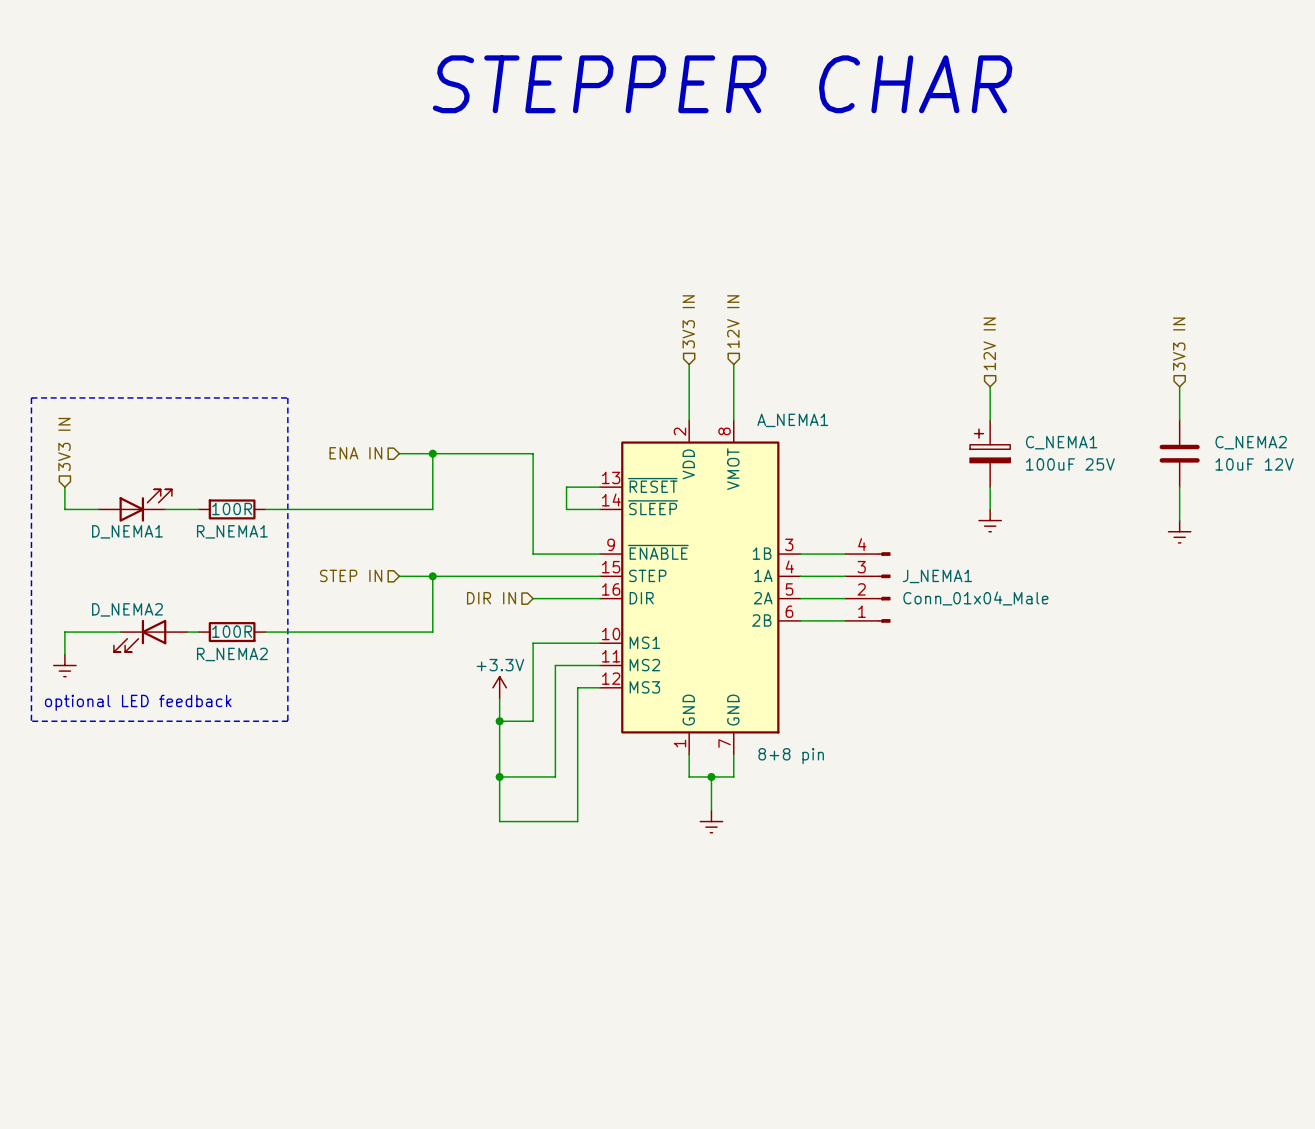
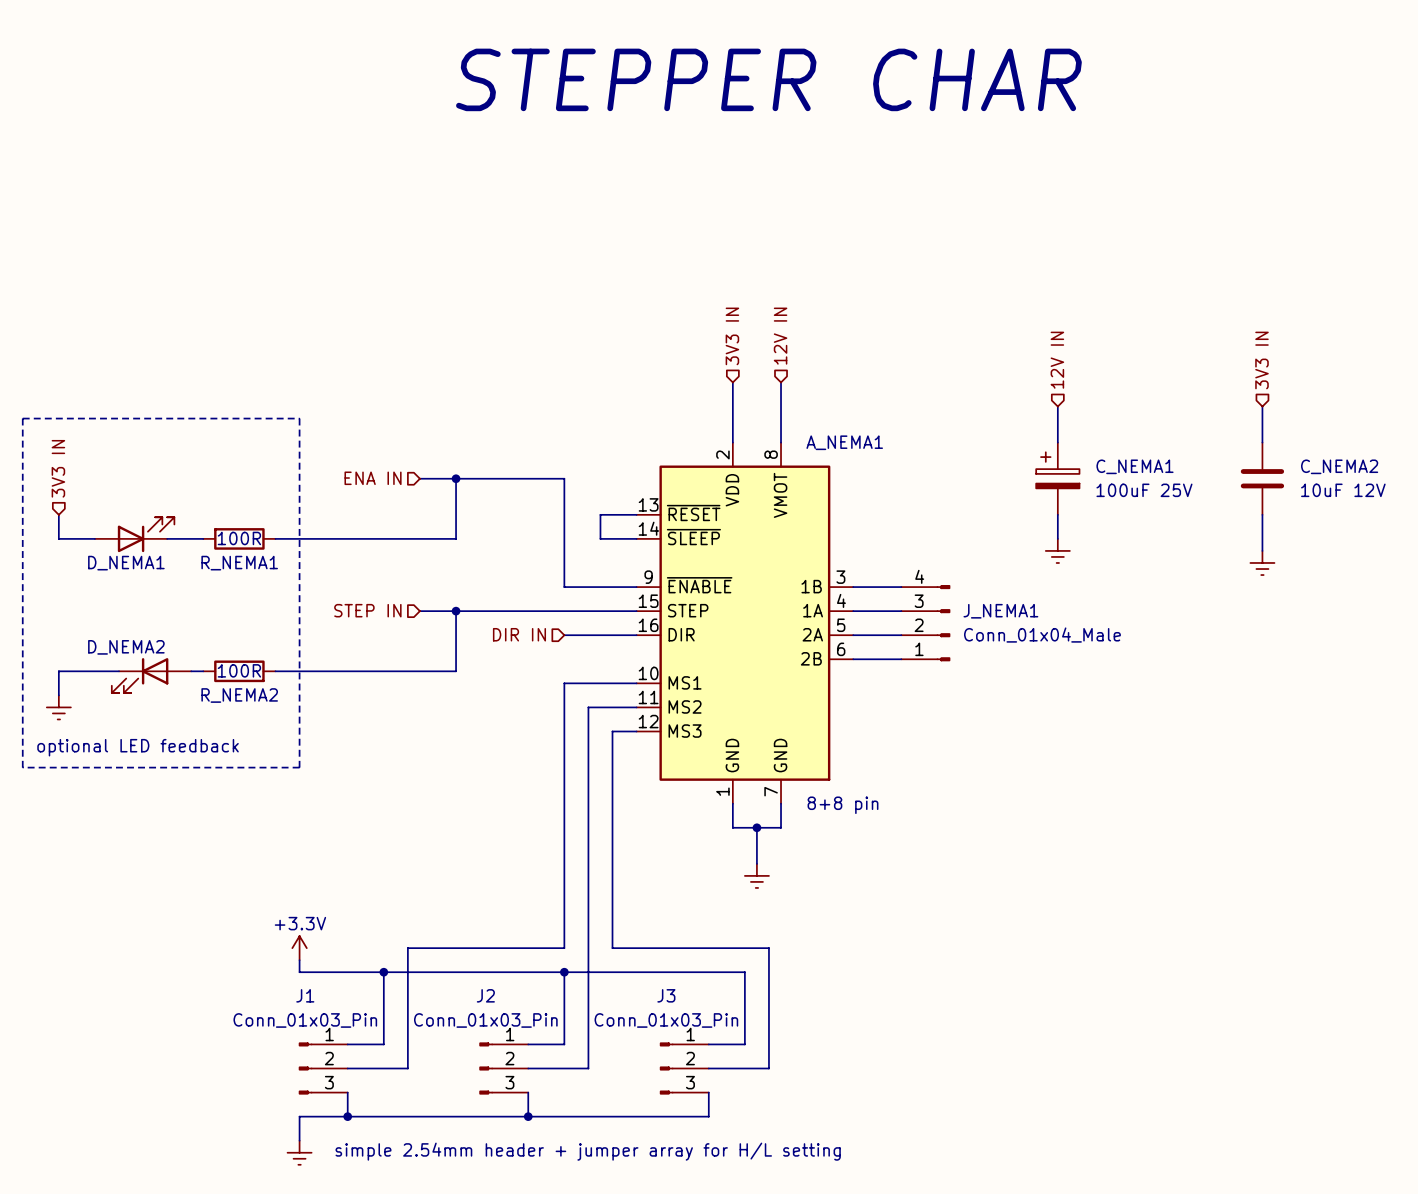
power symbol: +3.3V (499, 687) -> none
wire: (499, 698) (499, 821) (577, 821) -> (708, 1068) (768, 1068) (768, 948) (612, 948) (612, 875)
wire: (499, 721) (533, 721) -> (347, 1068) (407, 1068) (407, 948) (564, 948) (564, 767)
junction: (499, 721) -> none
wire: (499, 776) (555, 776) -> (528, 1068) (588, 1068) (588, 827)
junction: (499, 776) -> none
power symbol: none -> +3.3V (299, 948)
wire: none -> (299, 960) (299, 972) (744, 972) (744, 1044) (708, 1044)
wire: none -> (383, 972) (383, 1044) (347, 1044)
junction: none -> (383, 972)
wire: none -> (564, 972) (564, 1044) (528, 1044)
junction: none -> (564, 972)
J1: none -> Conn_01x03_Pin (323, 1068)
J2: none -> Conn_01x03_Pin (503, 1068)
J3: none -> Conn_01x03_Pin (684, 1068)
wire: none -> (347, 1092) (347, 1116)
wire: none -> (528, 1092) (528, 1116)
wire: none -> (708, 1092) (708, 1116) (299, 1116) (299, 1140)
junction: none -> (347, 1116)
junction: none -> (528, 1116)
text: none -> simple 2.54mm header + jumper array for H/L setting (588, 1151)
power symbol: none -> (299, 1152)

